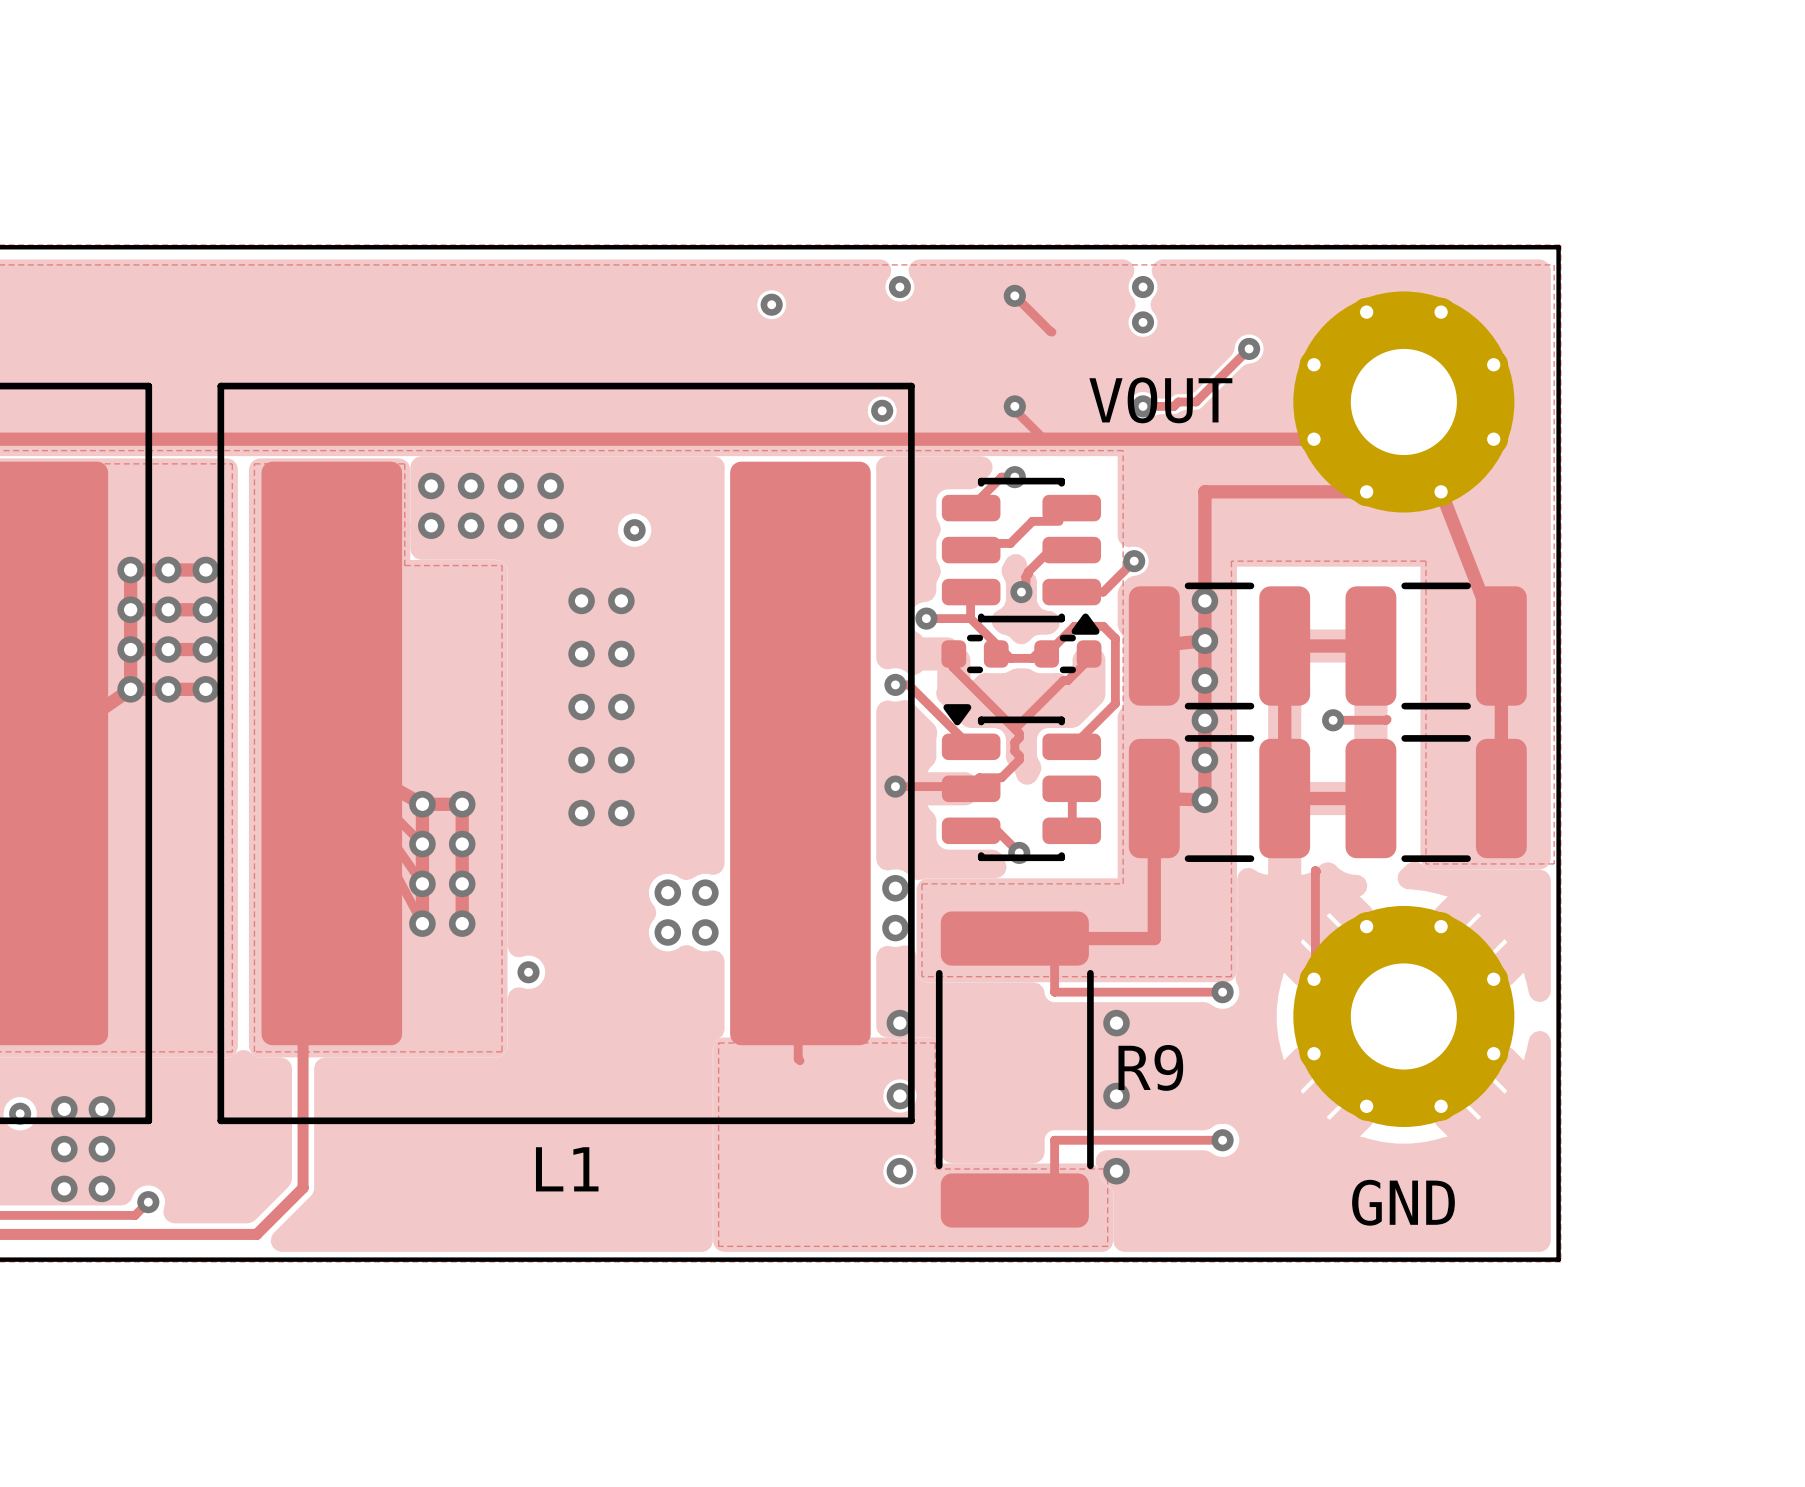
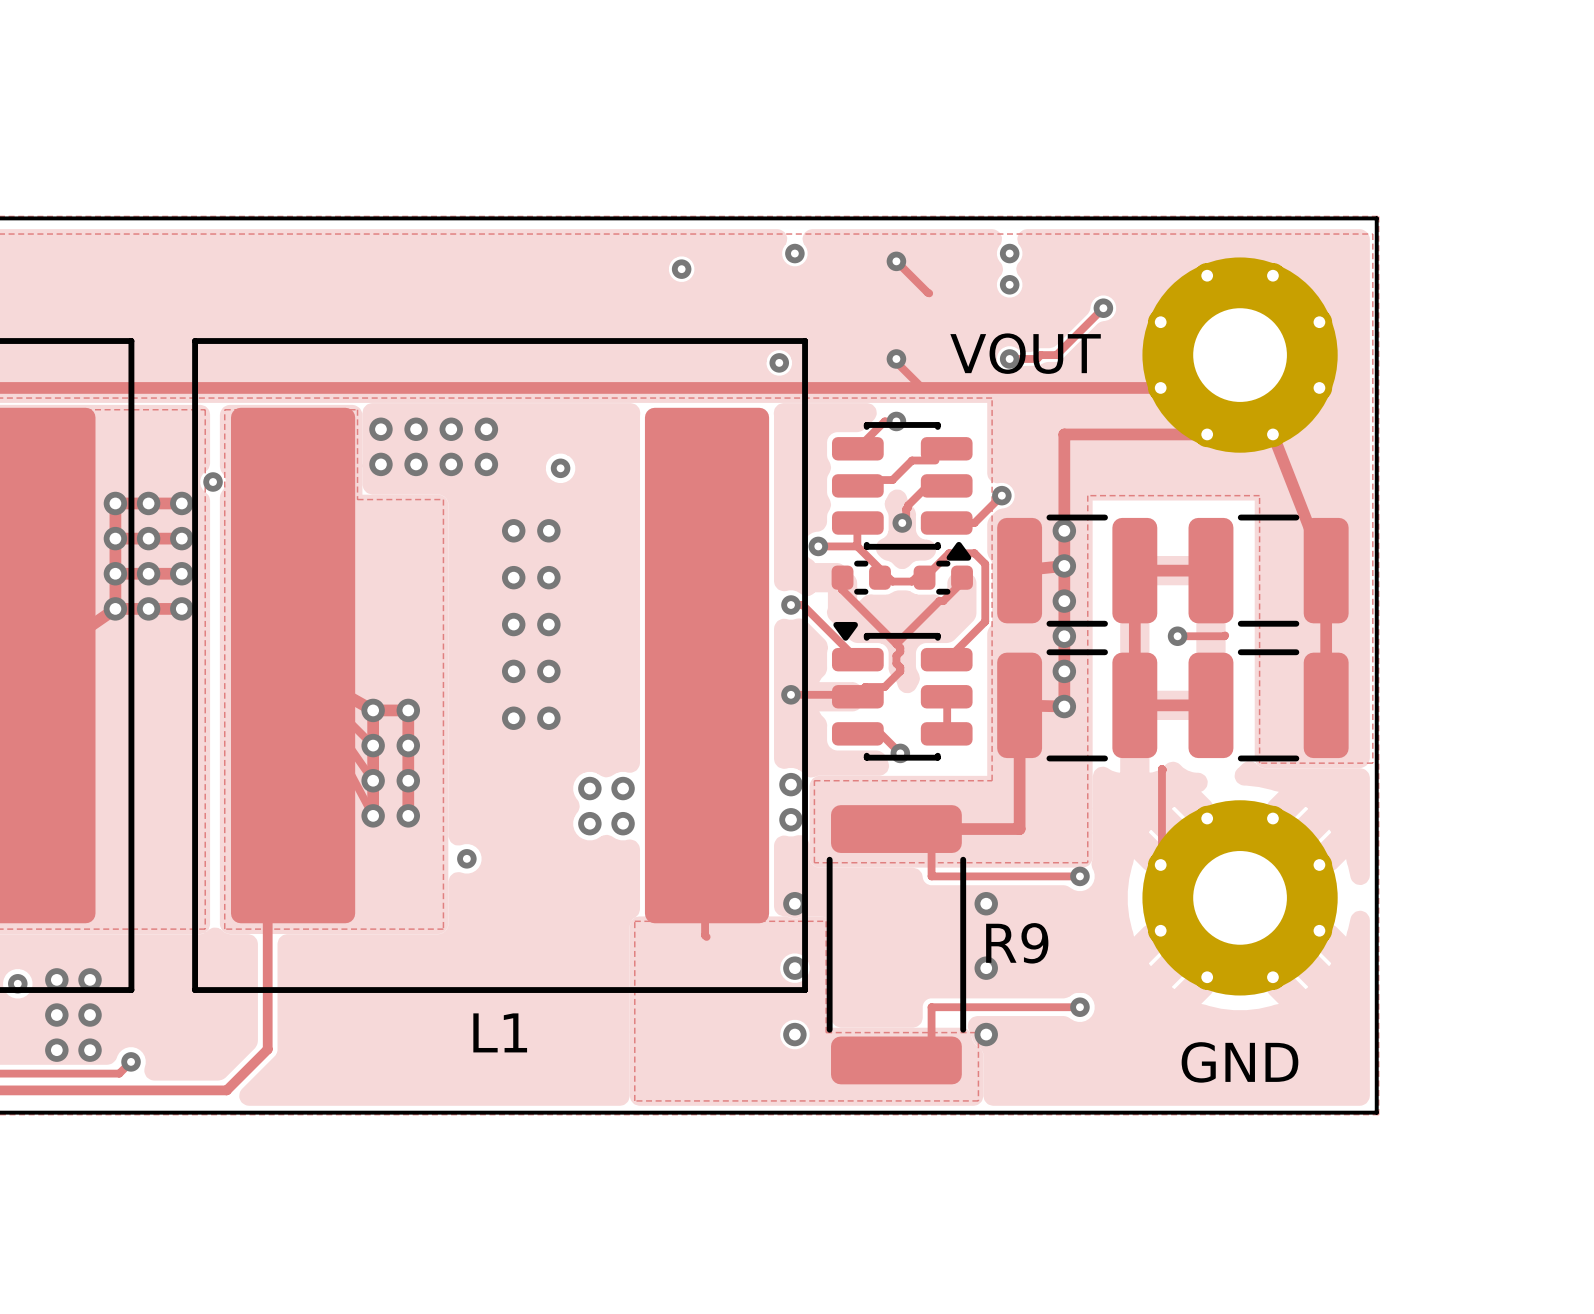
via: none -> (213, 481)

